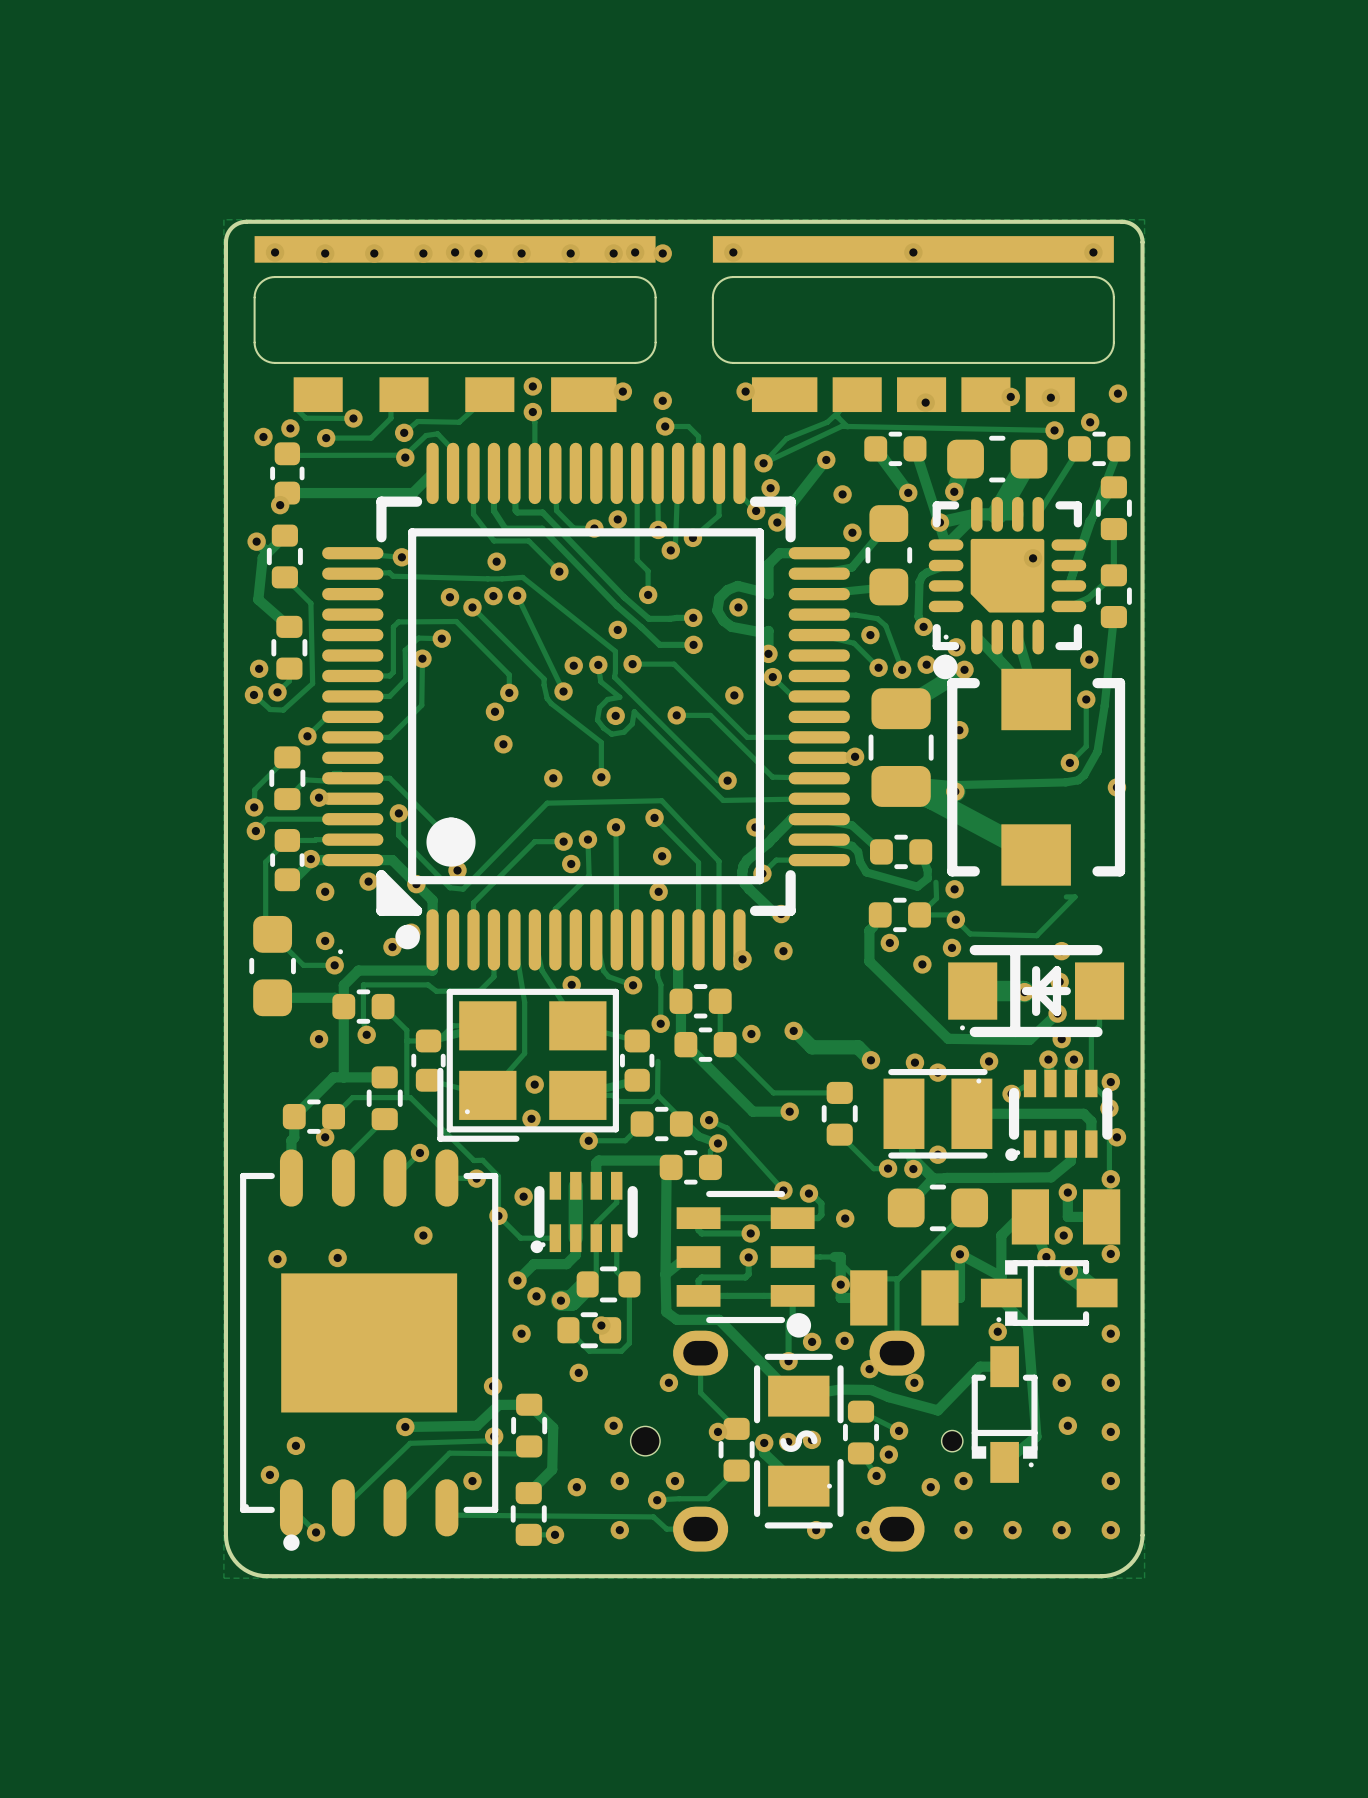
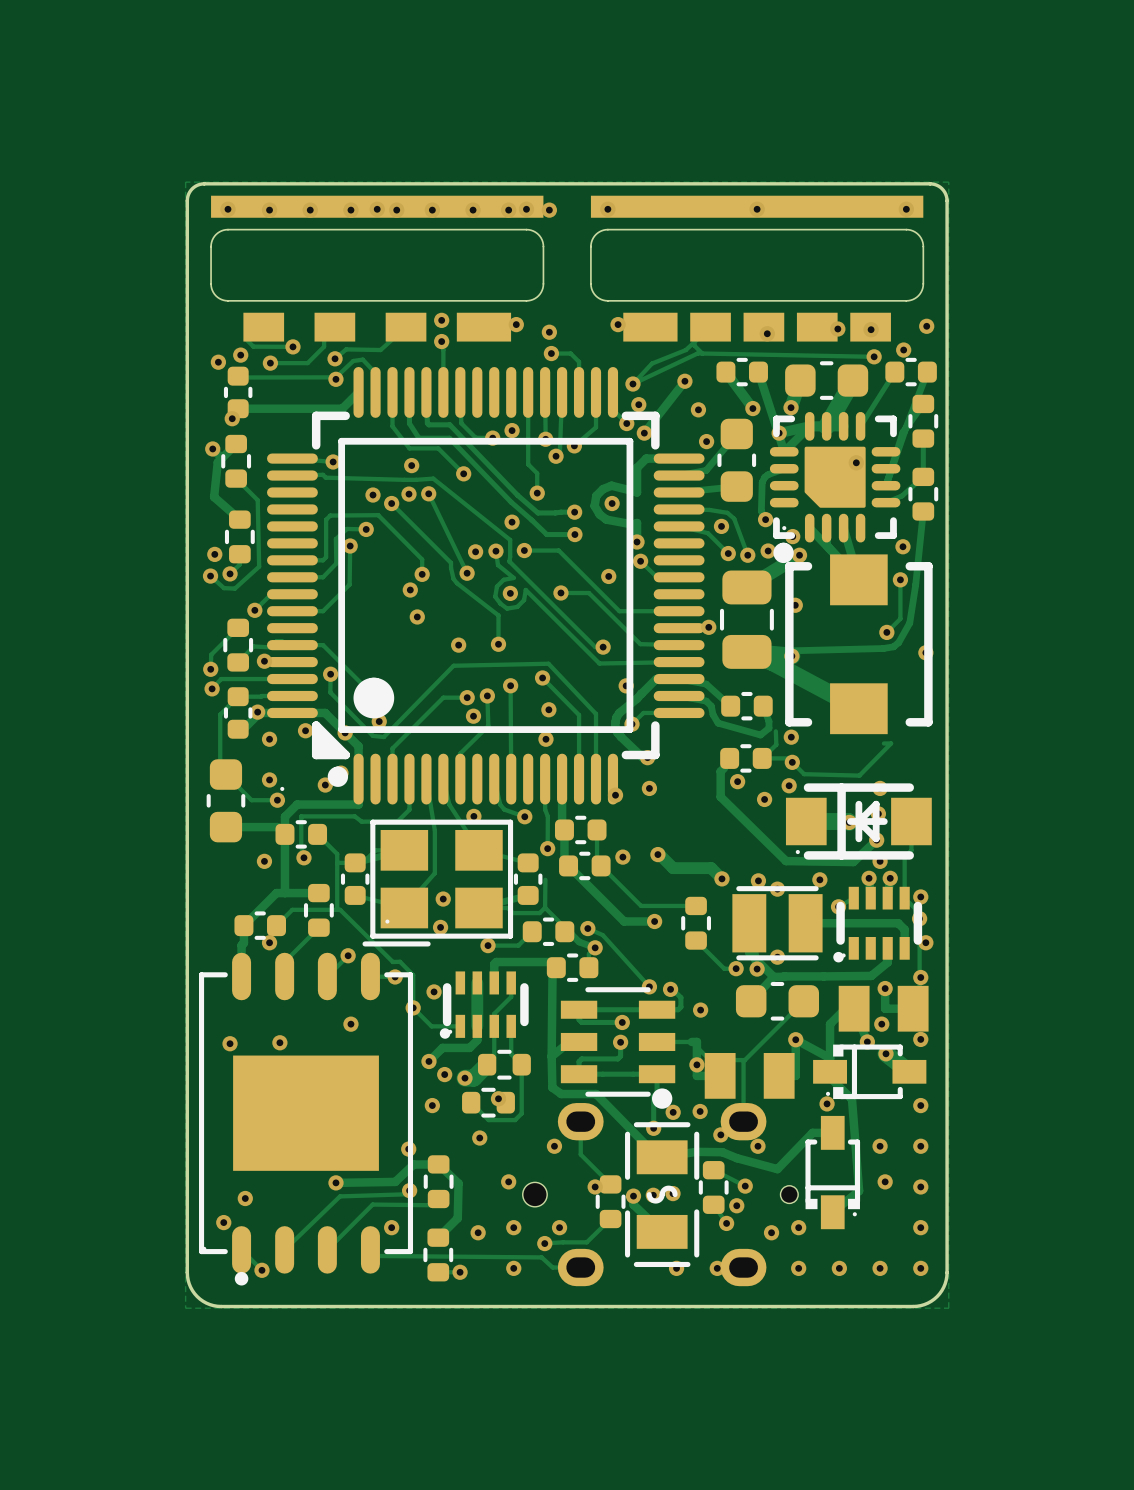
part footprint: [437, 988, 619, 1142] -> [362, 819, 514, 947]
part footprint: [883, 1068, 993, 1159] -> [732, 886, 823, 961]
part footprint: [754, 1353, 844, 1529] -> [625, 1122, 700, 1268]

